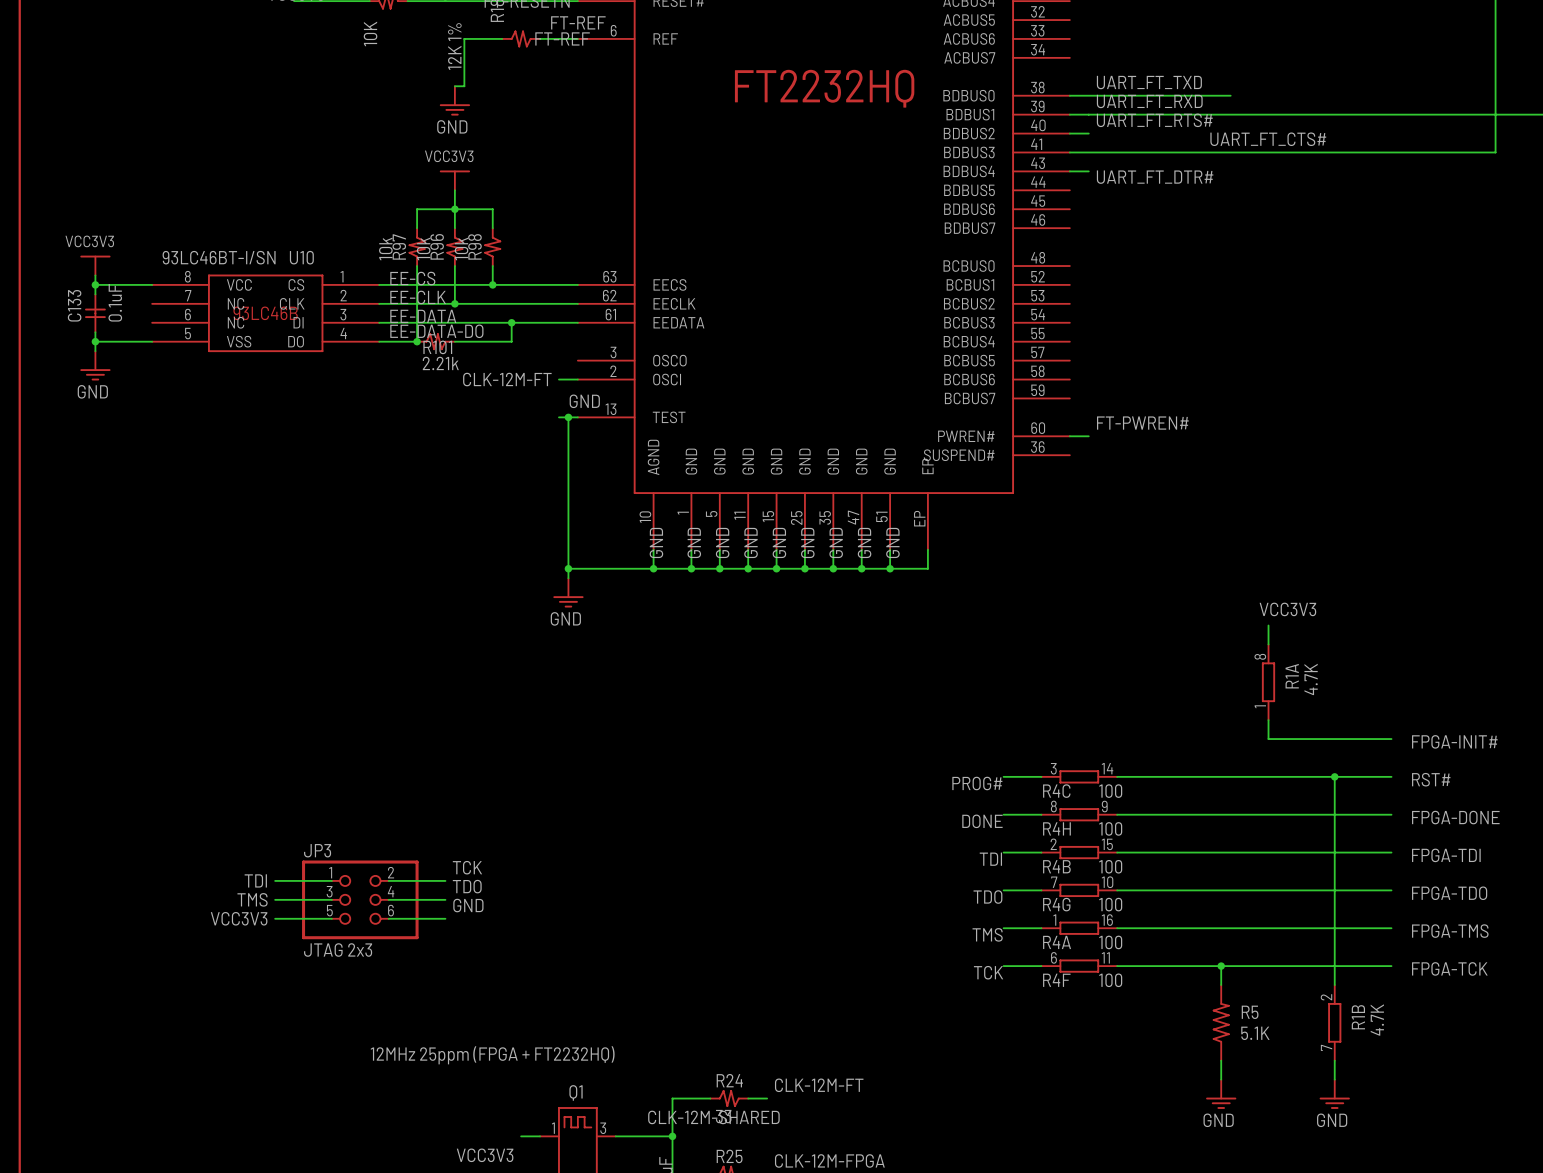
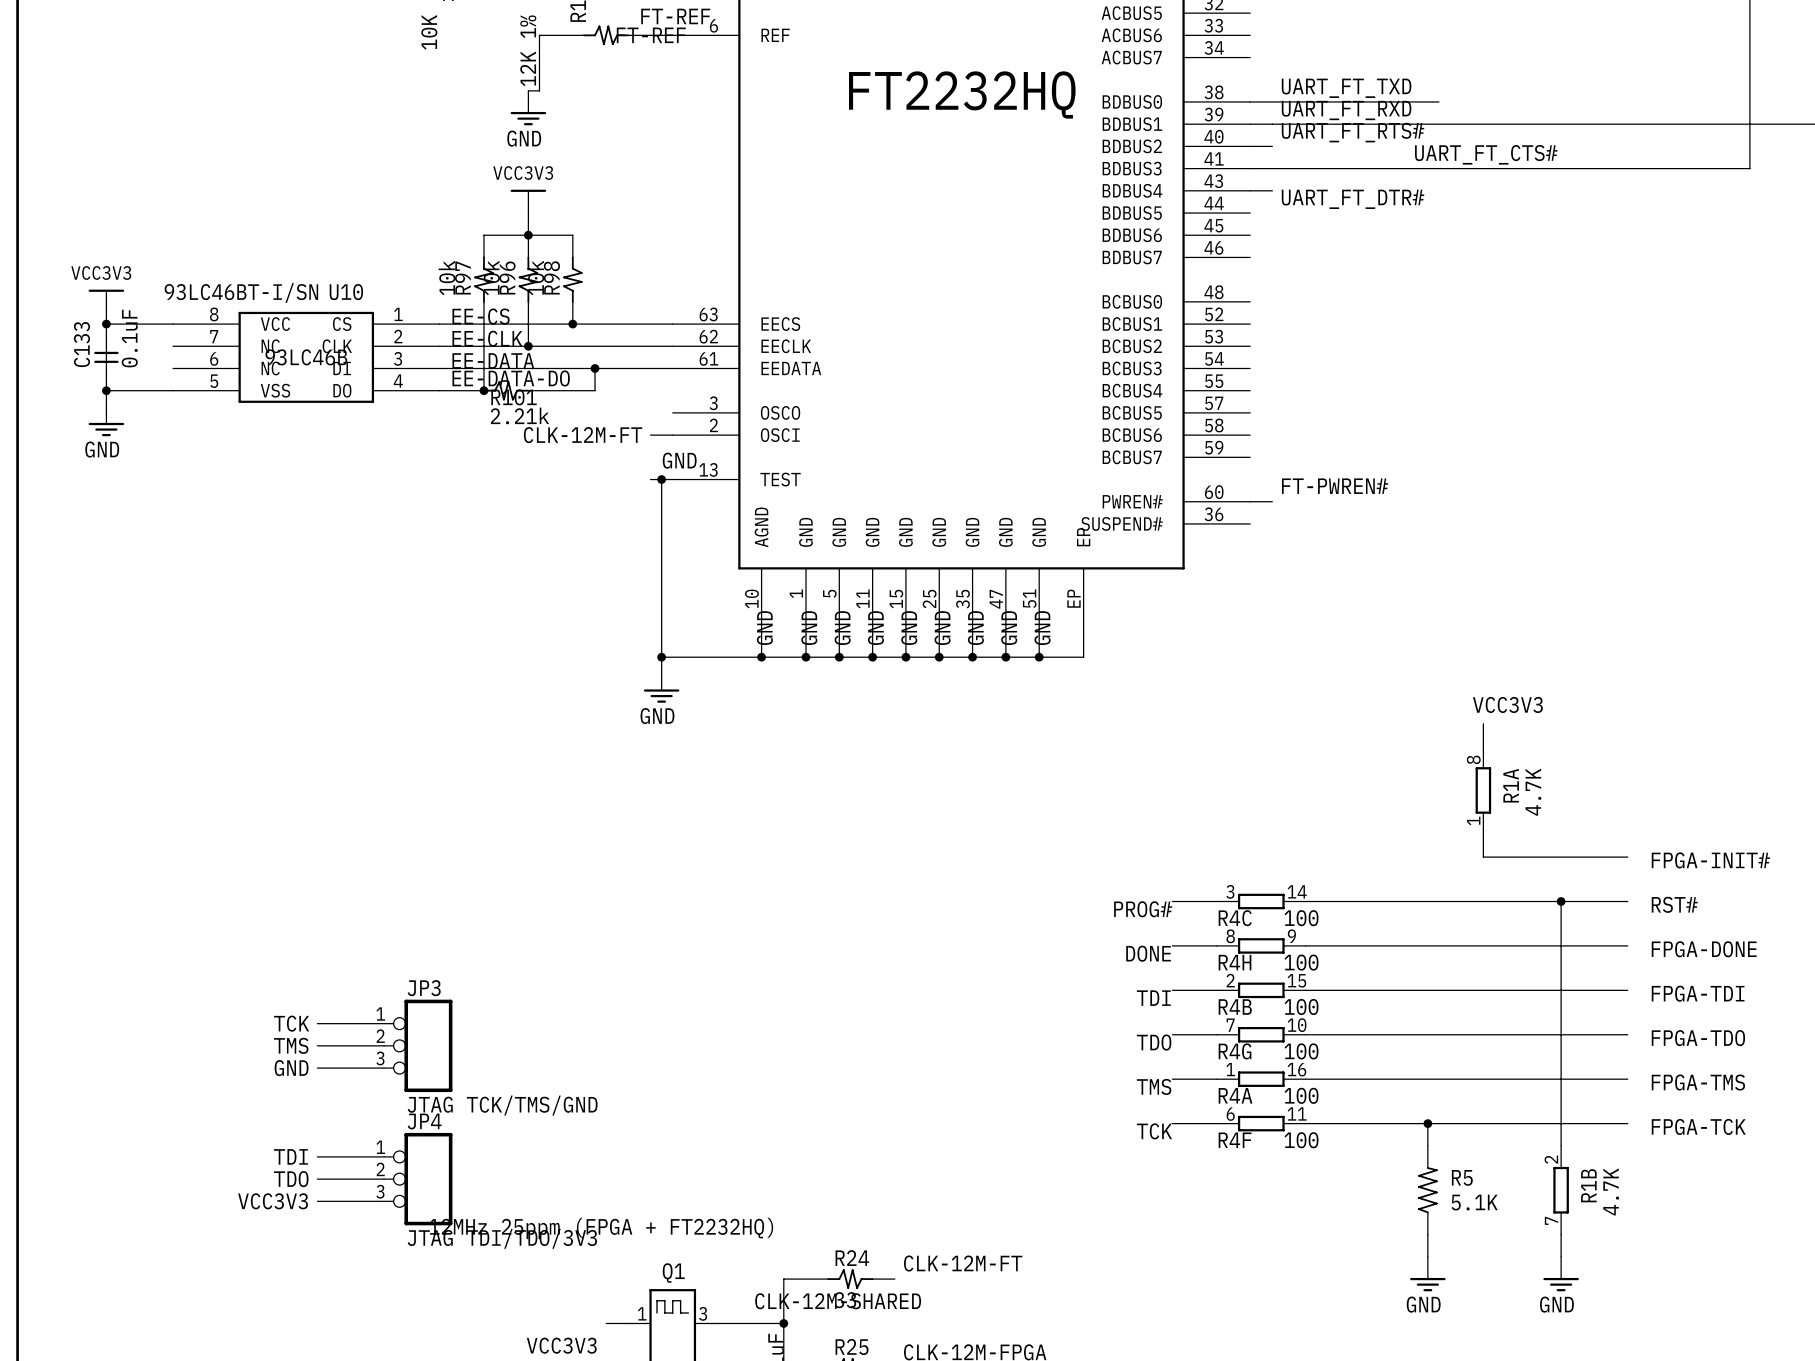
JP3 name position: JP3 (317, 850) -> JP3 (424, 988)
JP3 symbol: [302, 860, 419, 940] -> [384, 999, 453, 1093]
label: TCK (467, 867) -> none
label: TDI (255, 880) -> TCK (291, 1023)
wire: (388, 880) (445, 880) -> (317, 1156) (384, 1156)
label: TDO (467, 886) -> none
wire: (388, 899) (445, 899) -> (317, 1179) (384, 1179)
label: GND (468, 905) -> none
label: VCC3V3 (239, 918) -> GND (291, 1068)
wire: (388, 918) (445, 918) -> (317, 1201) (384, 1201)
JP3 value: JTAG 2x3 (338, 950) -> JTAG TCK/TMS/GND (502, 1105)
label: none -> TDI (290, 1156)
label: none -> TDO (291, 1179)
JP4: none -> JTAG TDI/TDO/3V3 (418, 1179)
label: none -> VCC3V3 (273, 1201)

